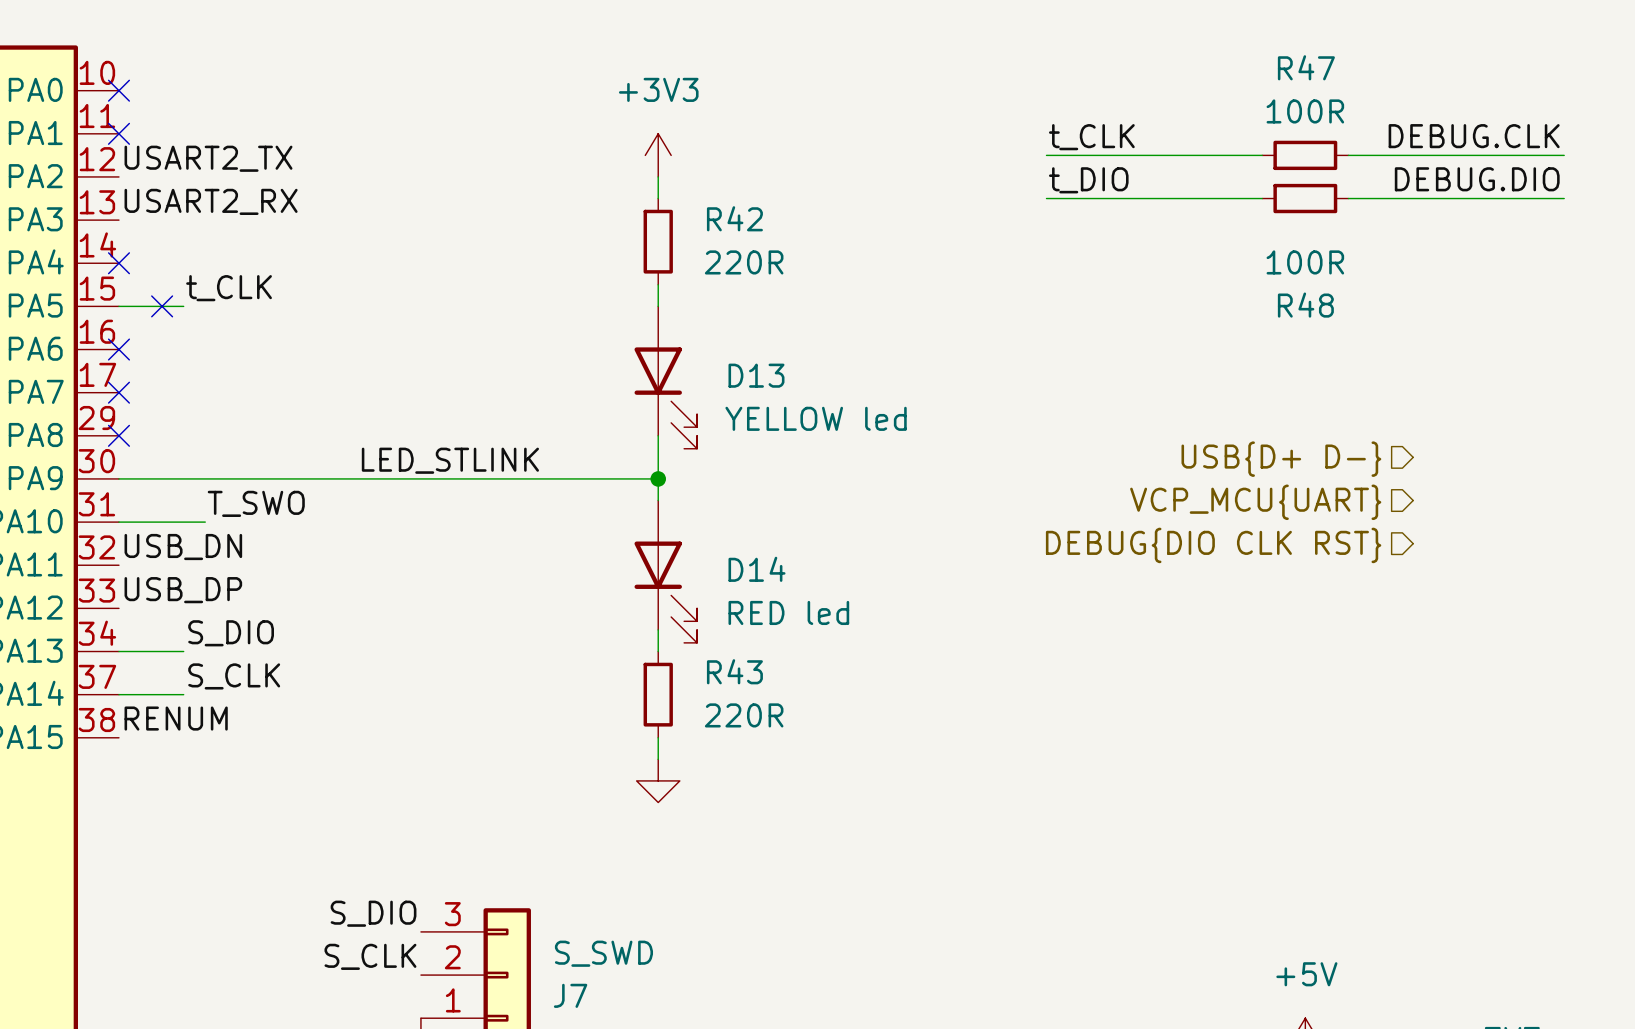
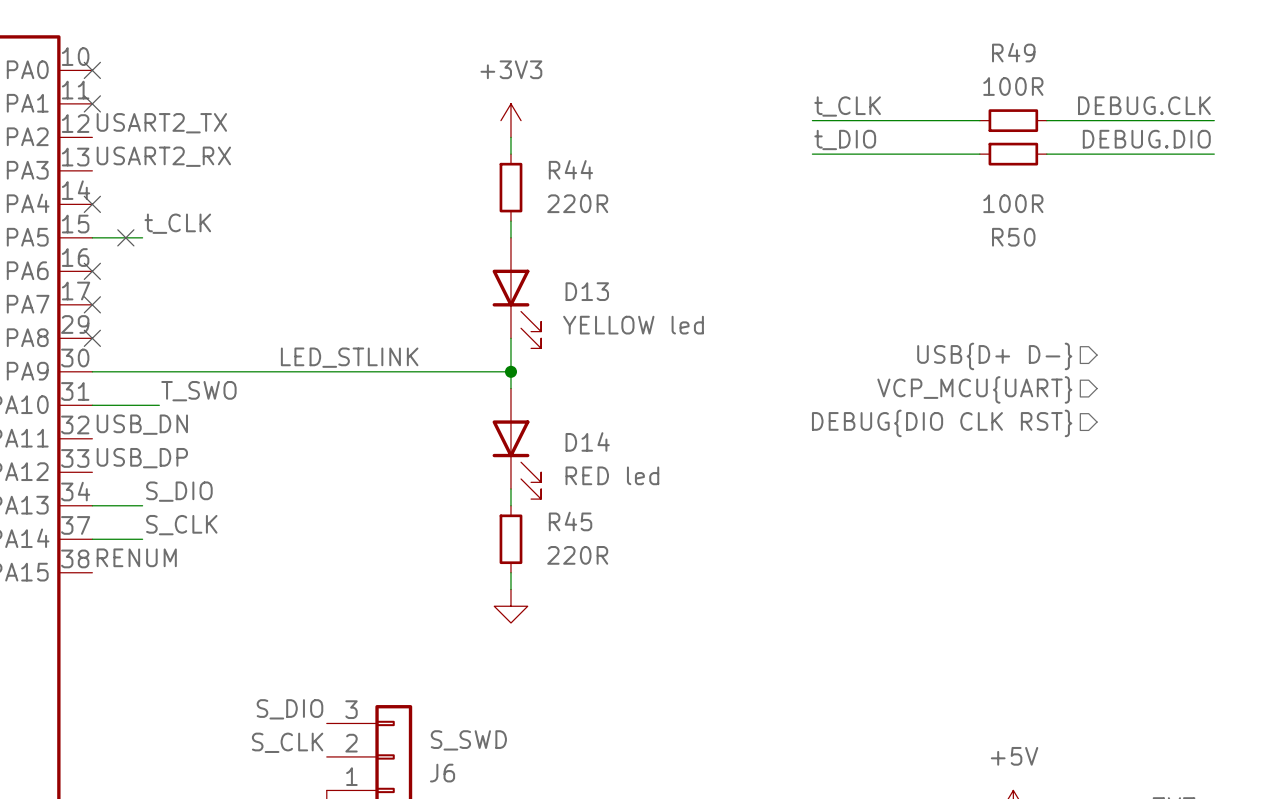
R47 name: R47 (1306, 67) -> R49 (1013, 52)
R42 name: R42 (734, 218) -> R44 (570, 169)
R48 name: R48 (1305, 305) -> R50 (1013, 237)
R43 name: R43 (734, 671) -> R45 (570, 521)
J7 name: J7 (570, 995) -> J6 (442, 773)

